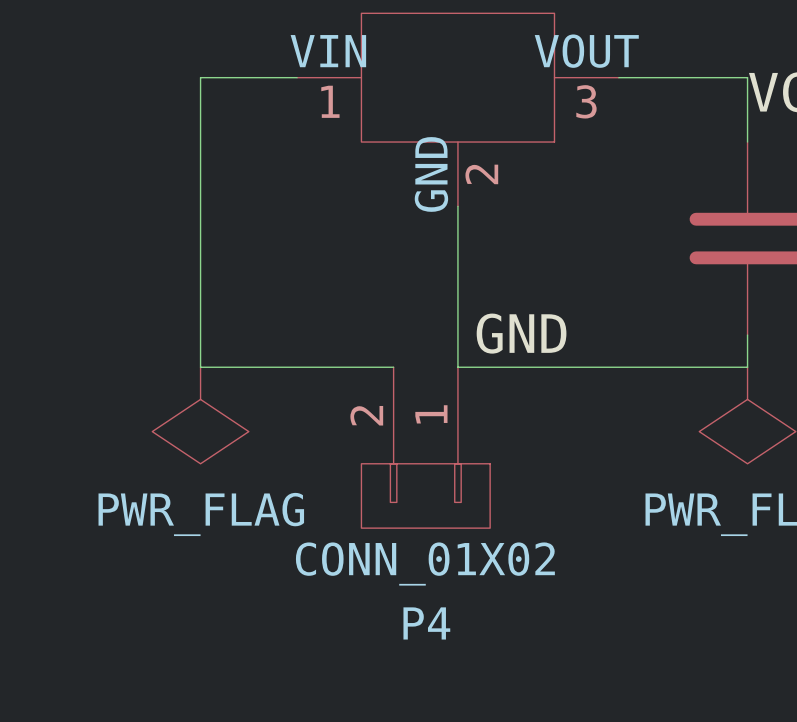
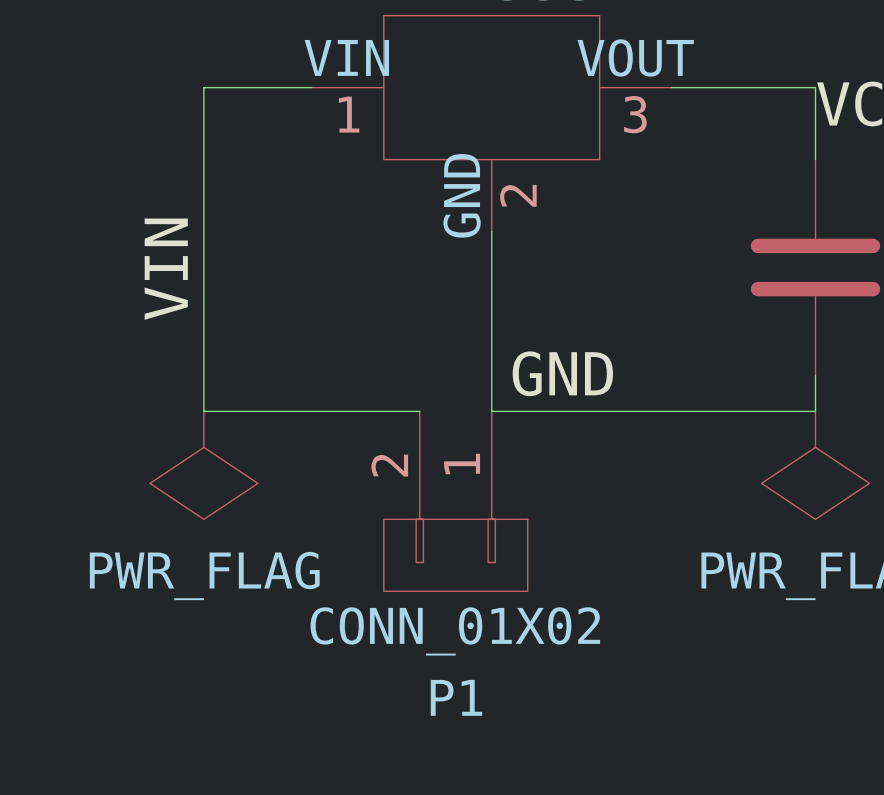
label: none -> VIN (166, 269)
P4 name: P4 (426, 623) -> P1 (456, 697)

